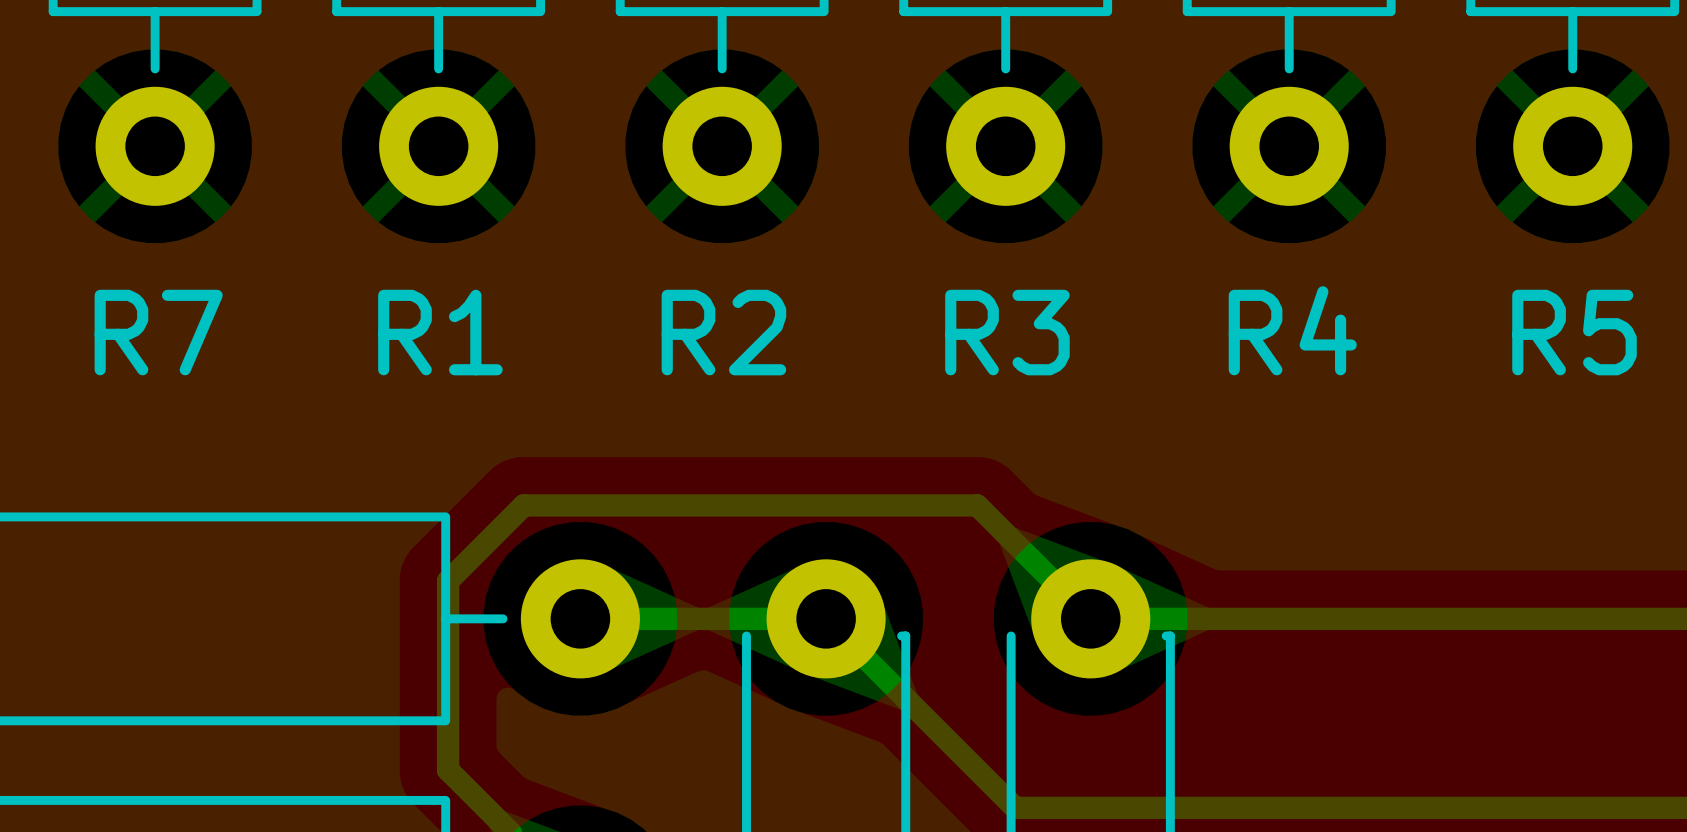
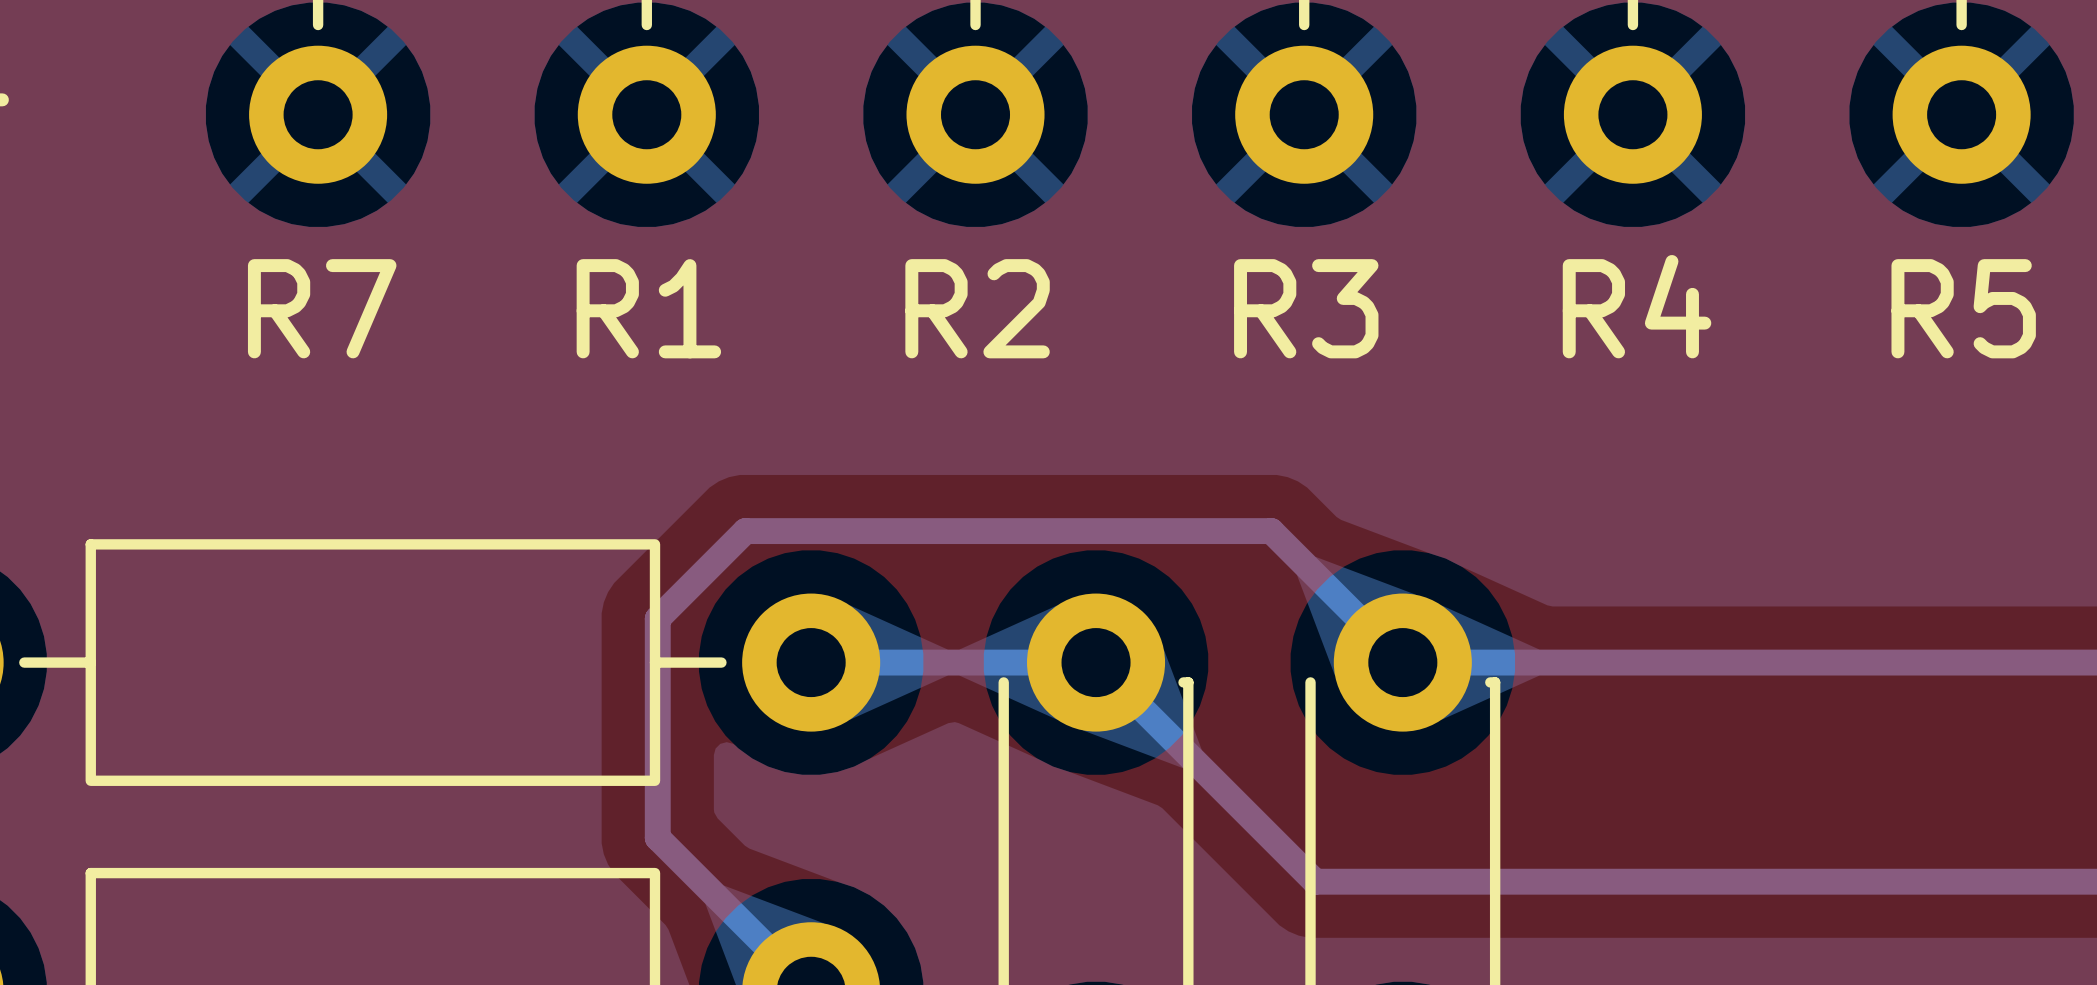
R4 name position: R4 (1292, 330) -> R4 (1637, 306)
R7 name position: R7 (158, 332) -> R7 (322, 308)
R1 name position: R1 (440, 332) -> R1 (648, 308)
R2 name position: R2 (723, 332) -> R2 (977, 308)
R3 name position: R3 (1007, 332) -> R3 (1306, 308)
R5 name position: R5 (1574, 332) -> R5 (1963, 308)

